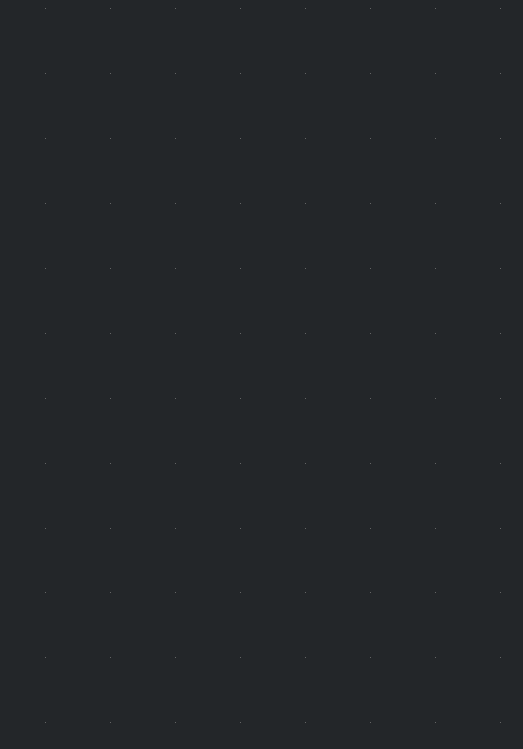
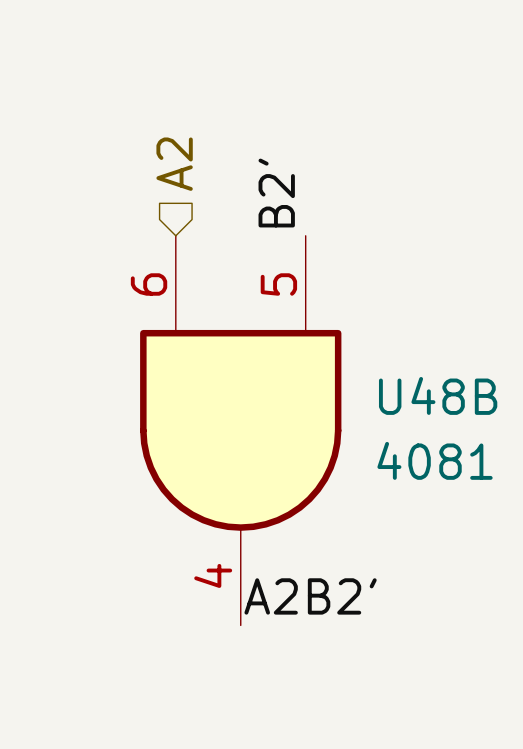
hierarchical label: none -> A2 (174, 164)
label: none -> B2' (276, 193)
U48B: none -> 4081 (240, 430)
label: none -> A2B2' (310, 596)

